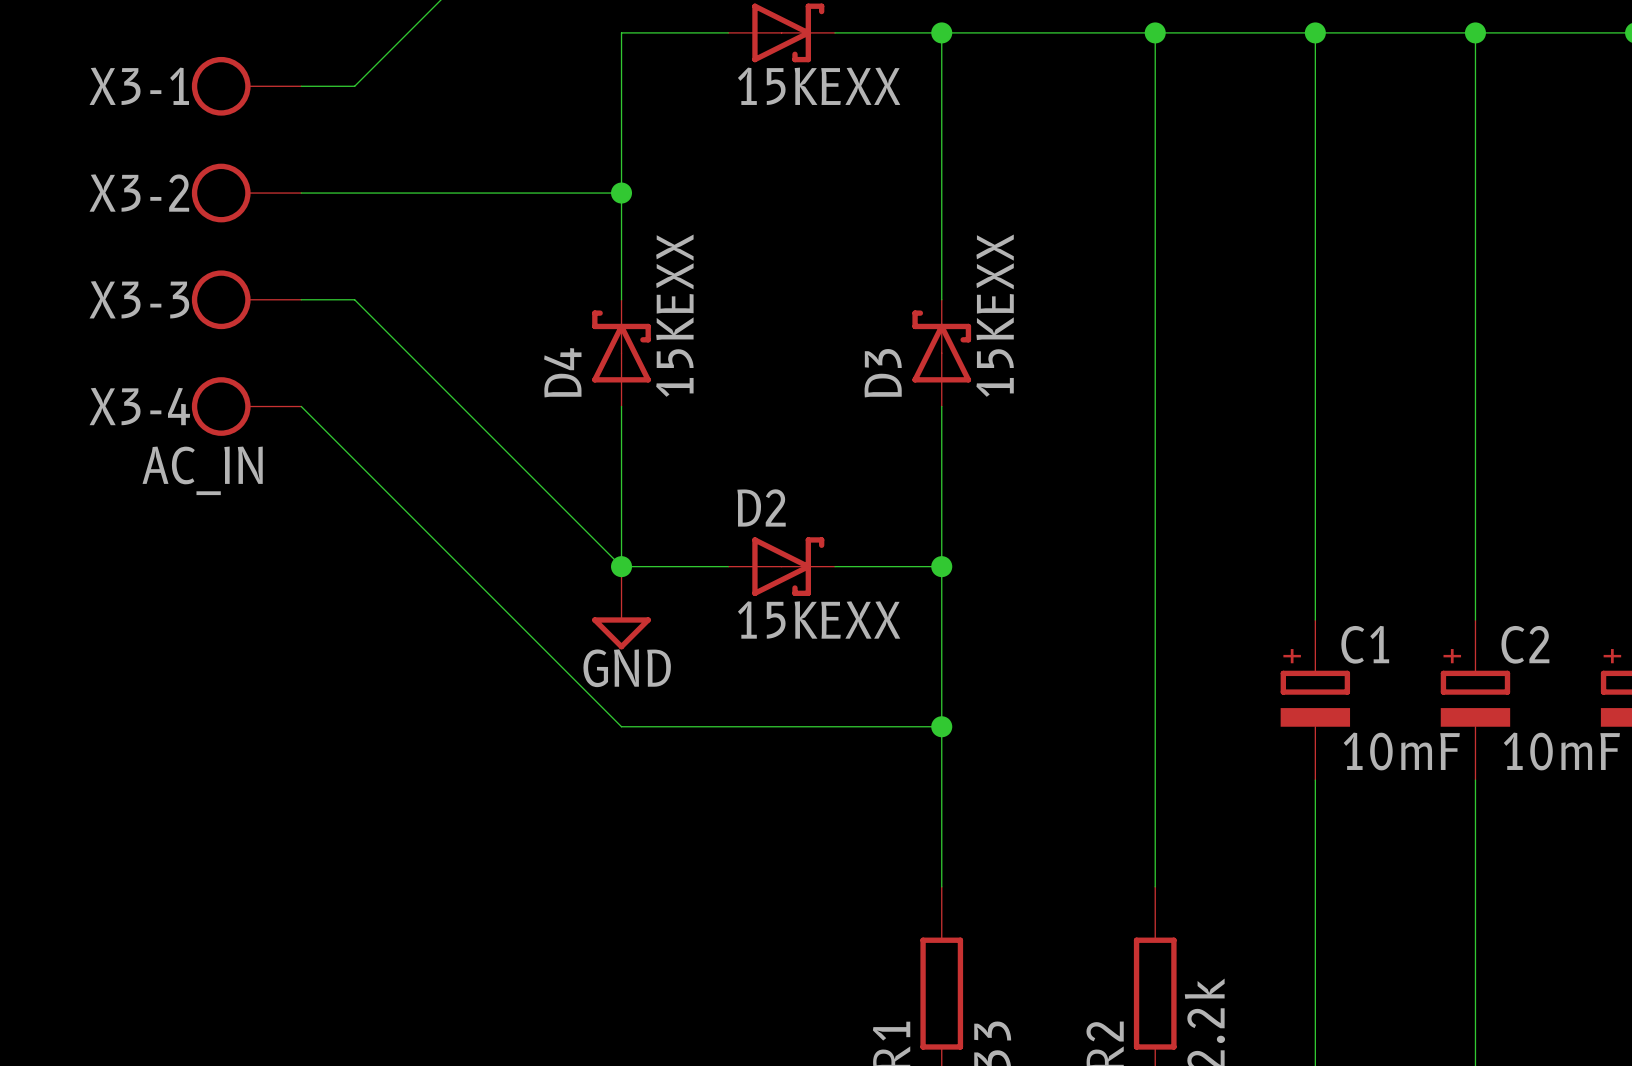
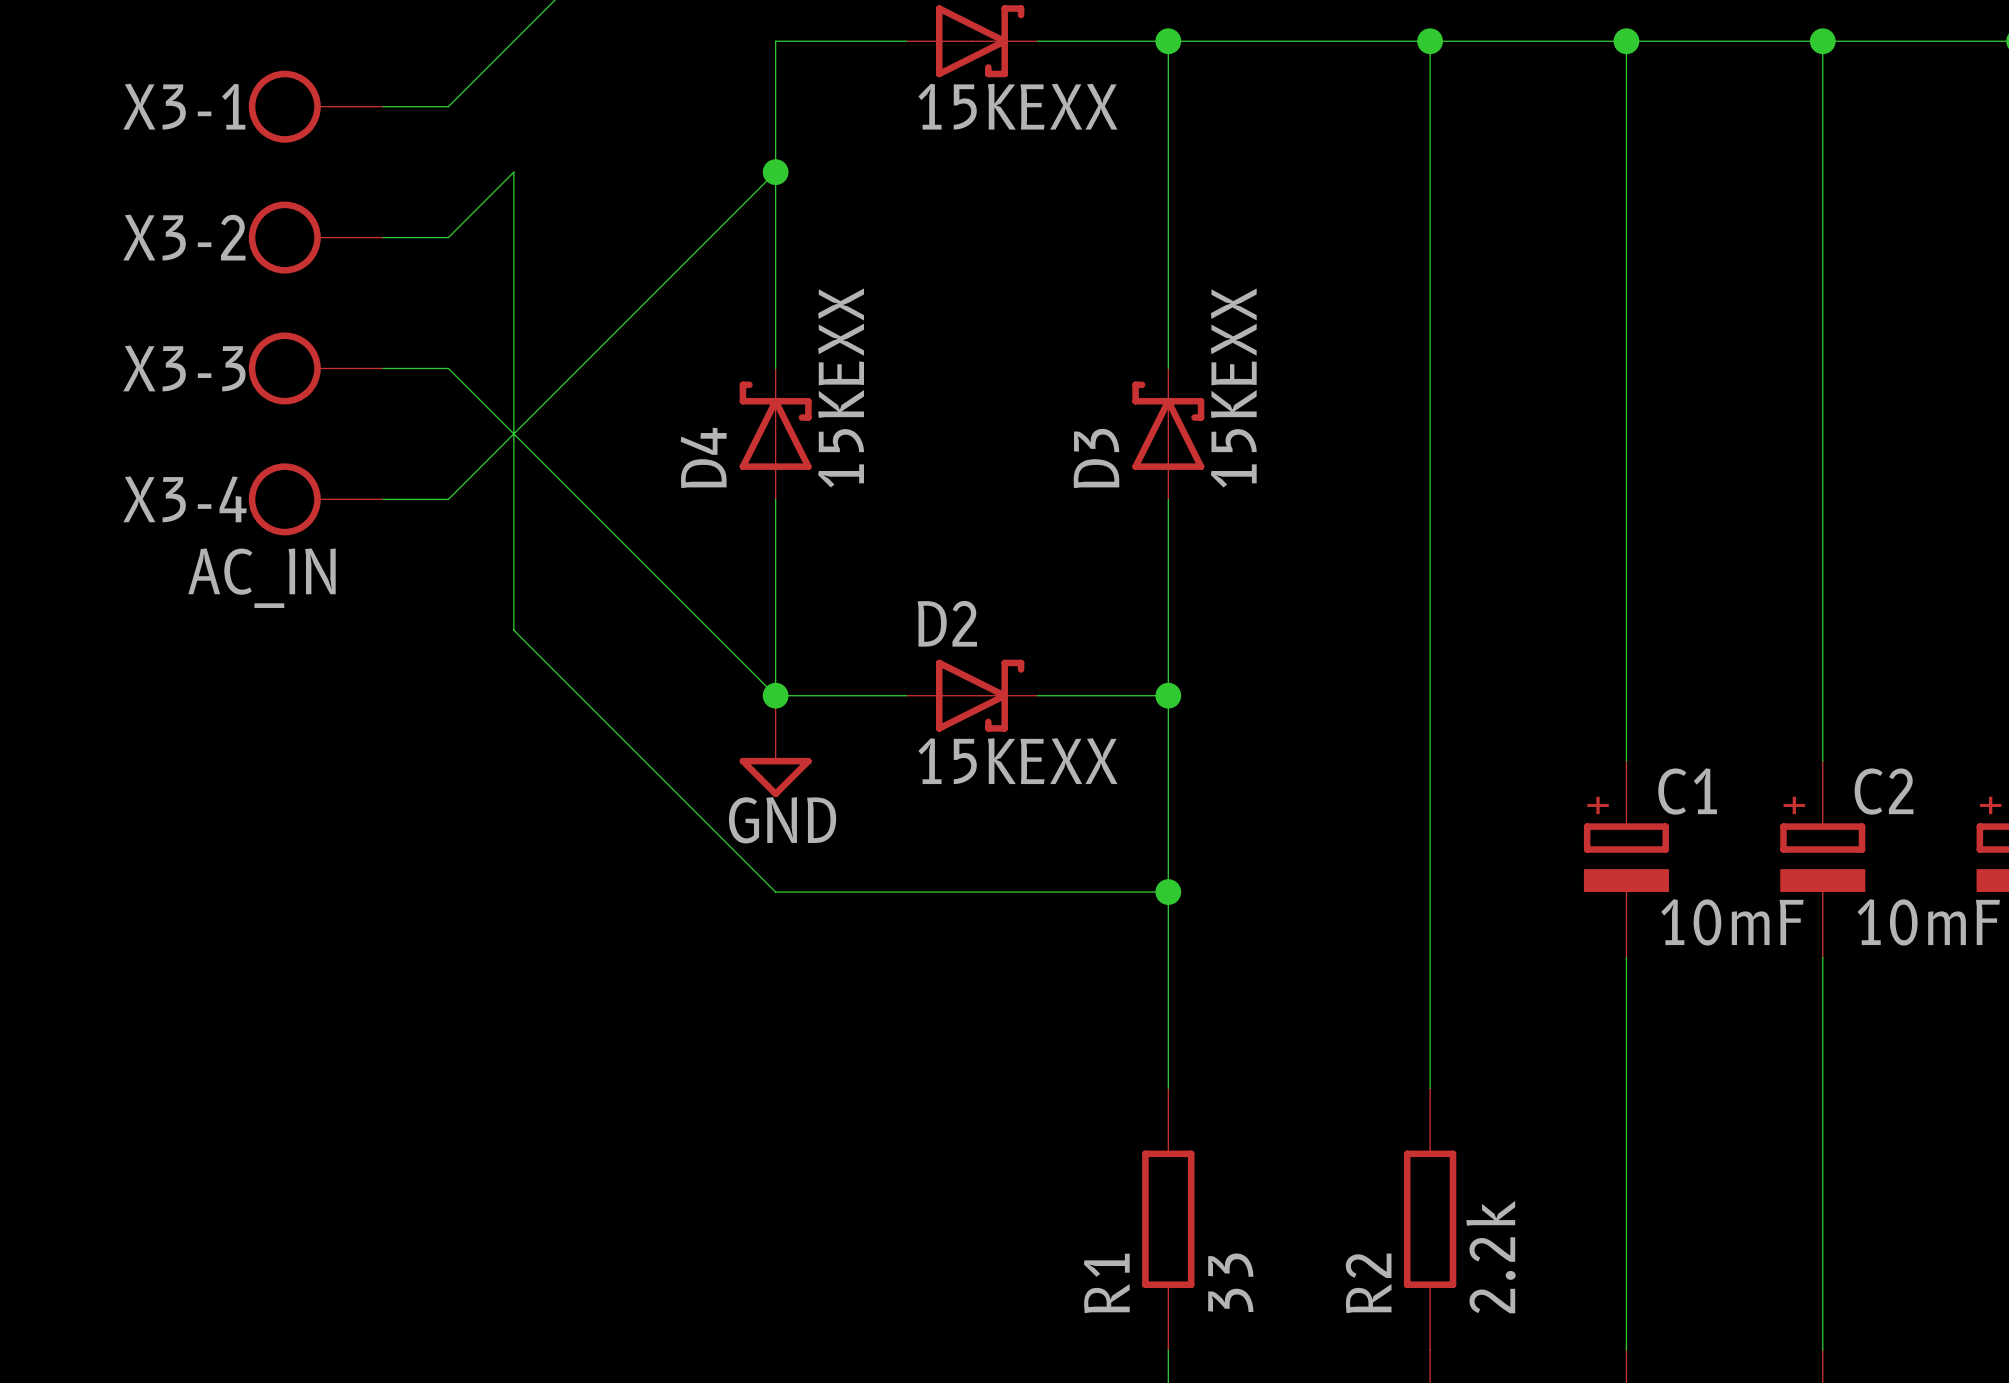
wire: none -> (775, 172) (448, 499) (382, 499)
wire: (354, 193) (621, 193) -> none
junction position: (621, 193) -> (775, 172)
wire: (301, 406) (408, 513) -> (448, 237) (513, 172) (513, 630)

